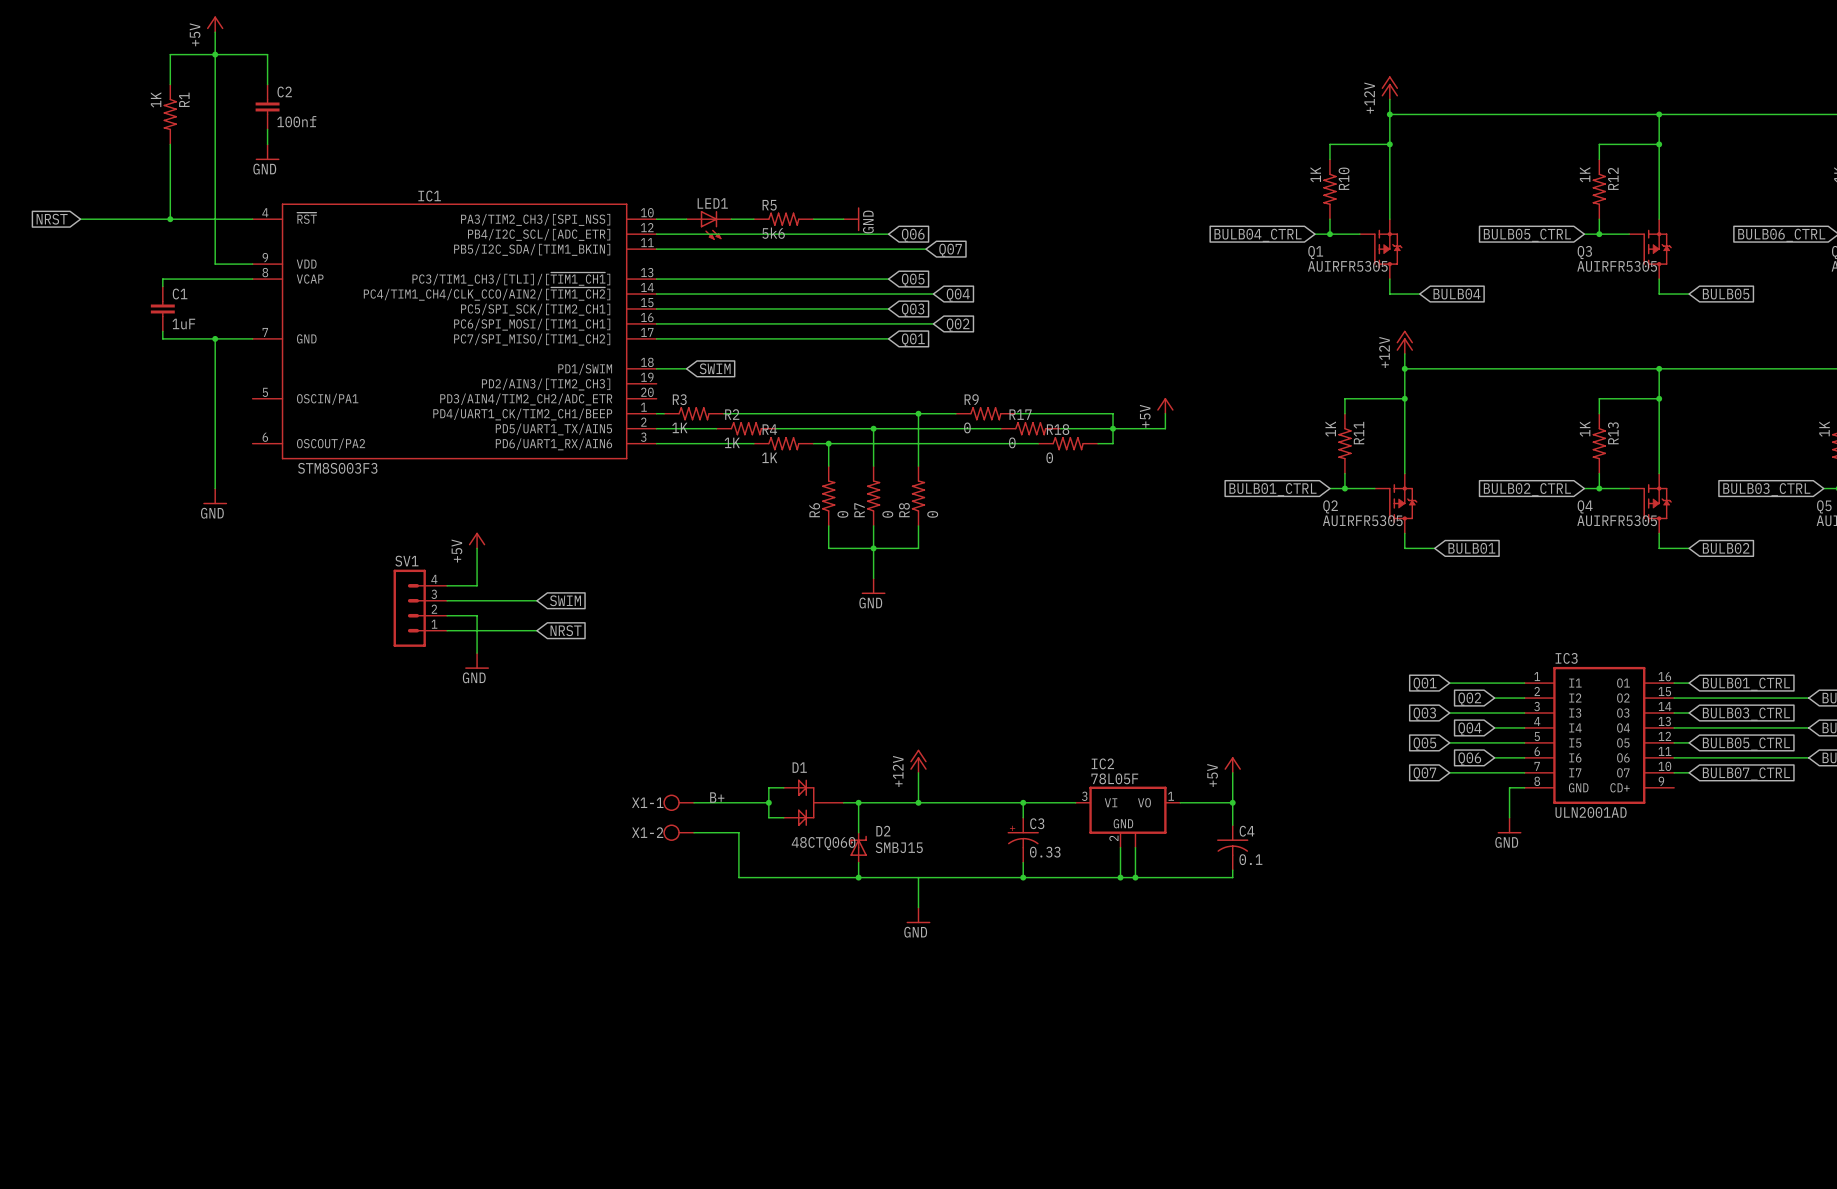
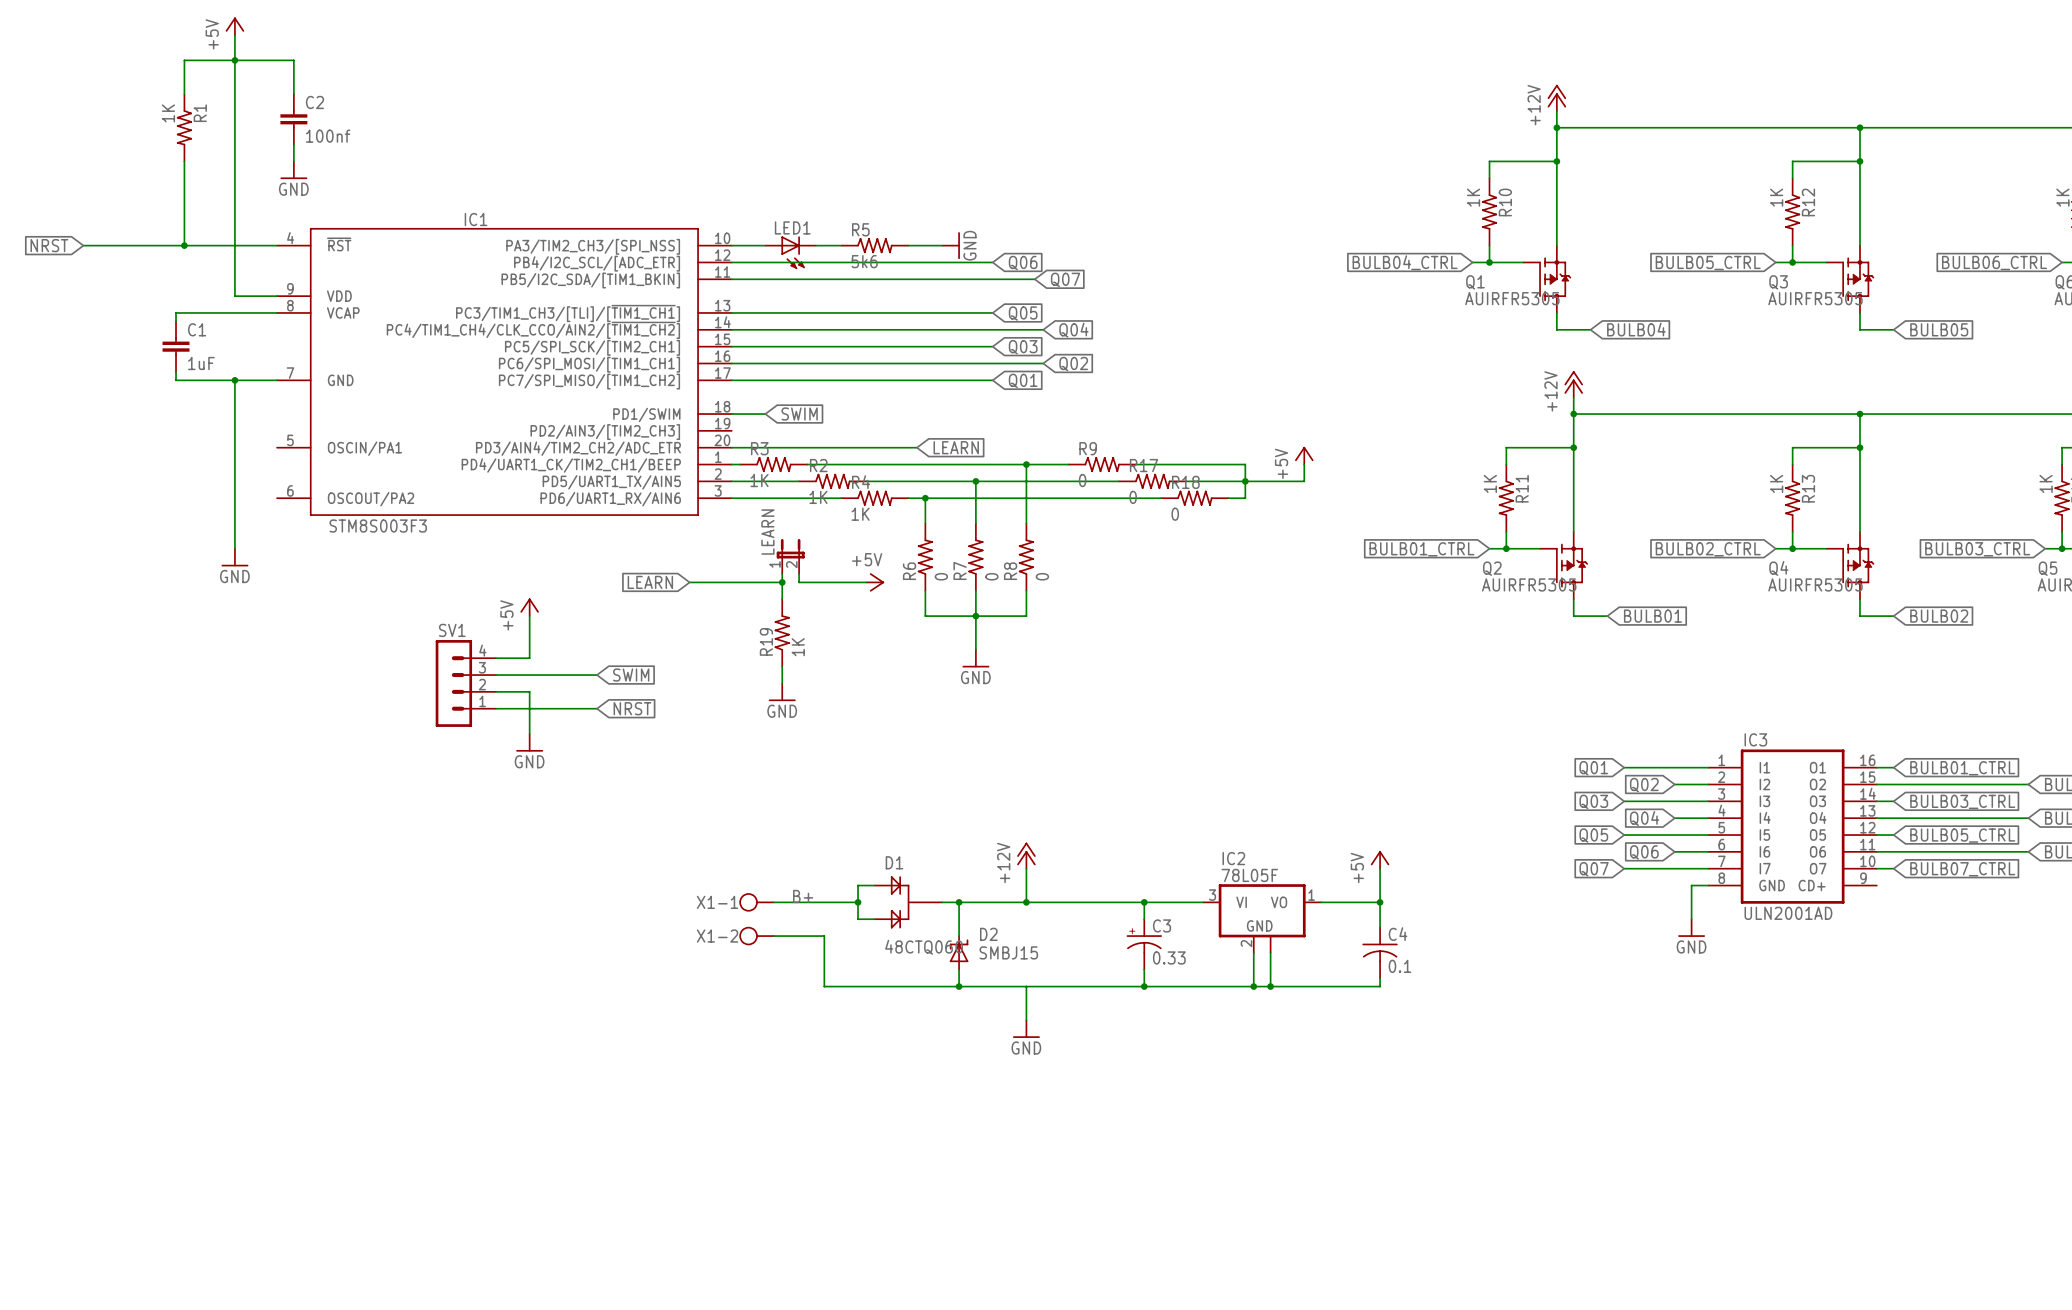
wire: none -> (731, 447) (916, 447)
global label: none -> LEARN (956, 447)
LEARN: none -> (790, 556)
wire: none -> (782, 574) (782, 599)
wire: none -> (799, 574) (799, 582) (866, 582)
global label: none -> LEARN (650, 582)
wire: none -> (689, 582) (782, 582)
junction: none -> (782, 582)
power symbol: none -> +5V (875, 582)
R19: none -> 1K (782, 632)
wire: none -> (782, 666) (782, 683)
power symbol: none -> GND (782, 692)

